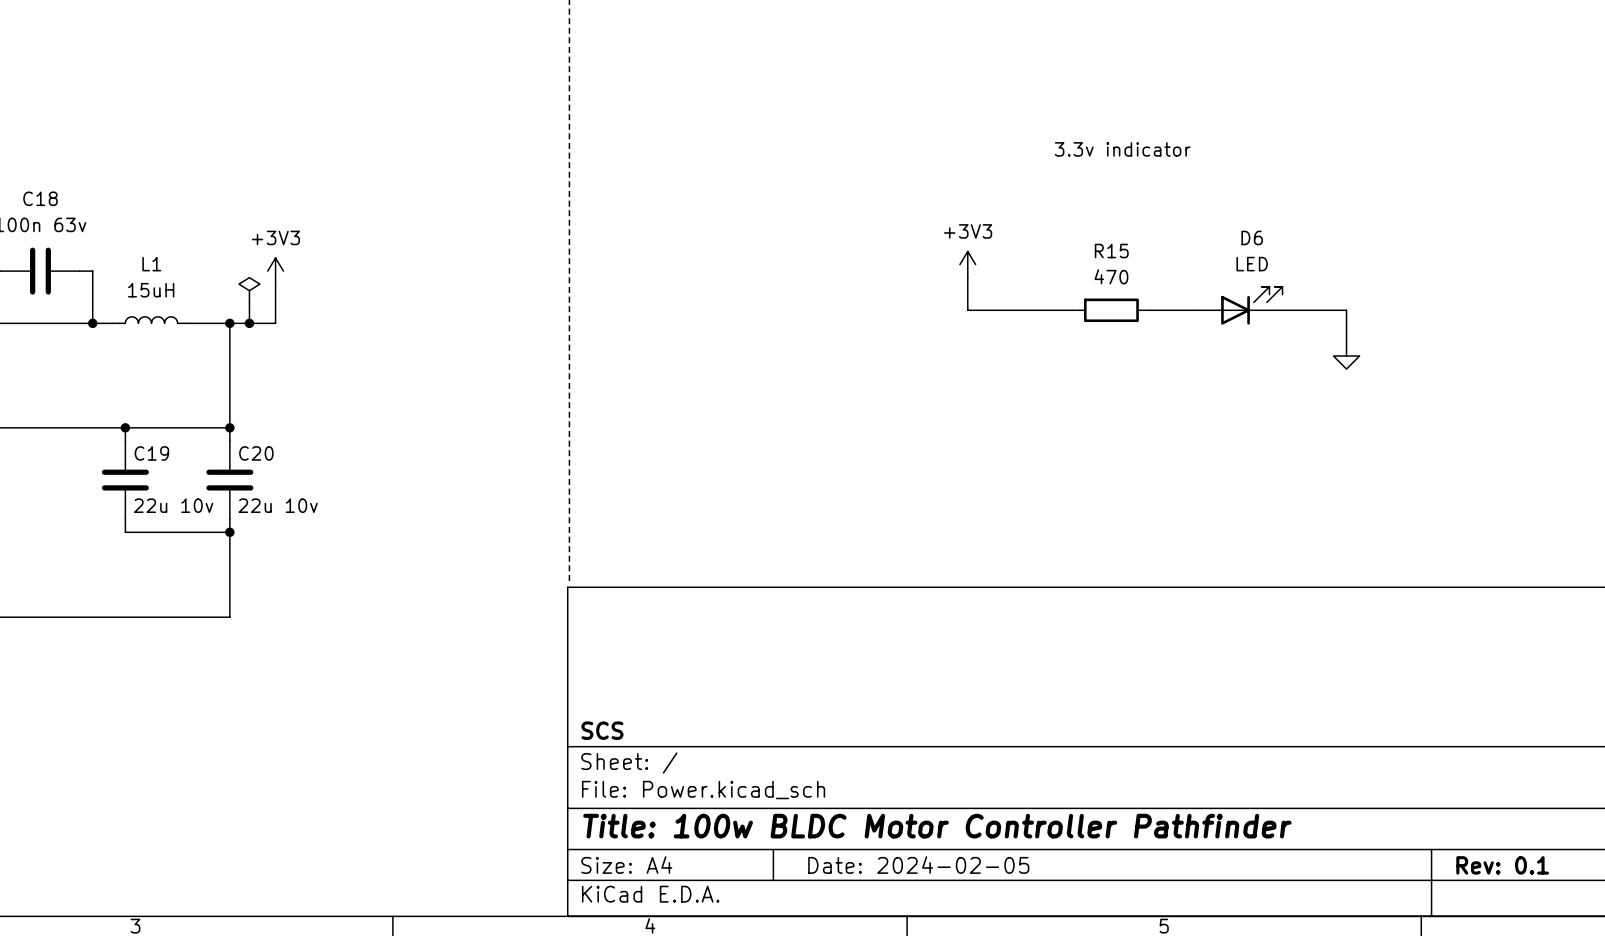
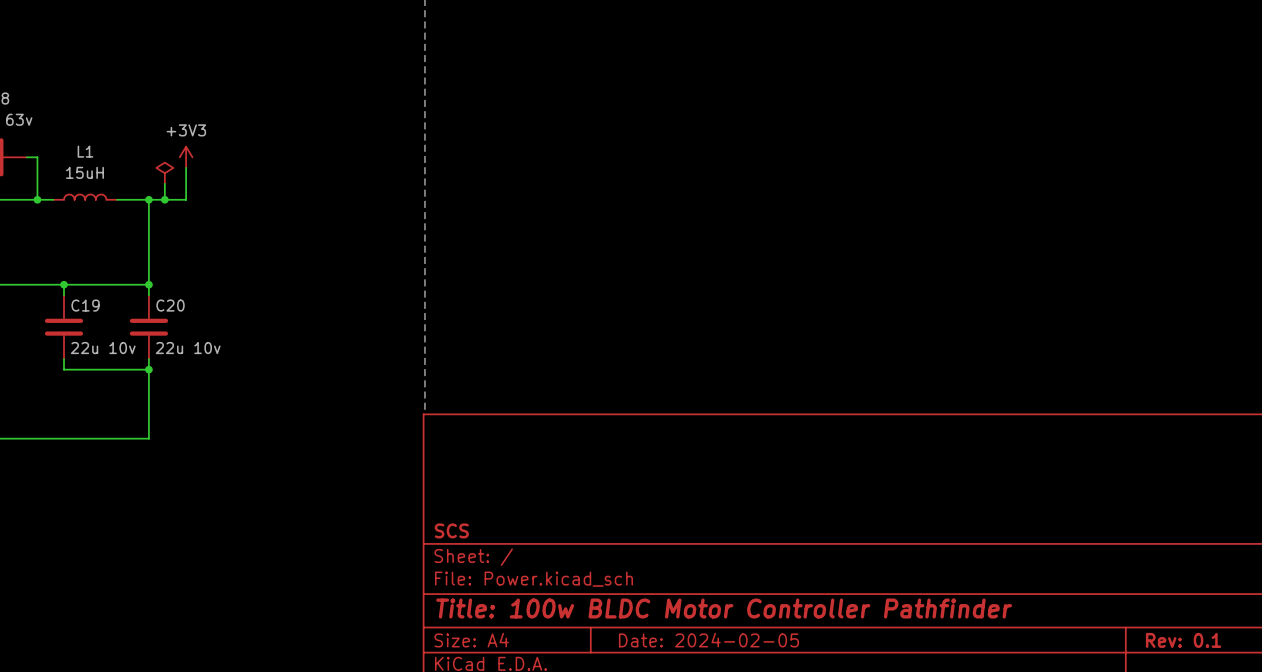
text: 3.3v indicator (1122, 149) -> none
power symbol: +3V3 (967, 264) -> none
wire: (967, 277) (967, 310) (1072, 310) -> none
D6: LED (1239, 305) -> none
R15: 470 (1111, 310) -> none
wire: (1150, 310) (1196, 310) -> none
wire: (1274, 310) (1346, 310) (1346, 342) -> none
power symbol: (1346, 356) -> none

